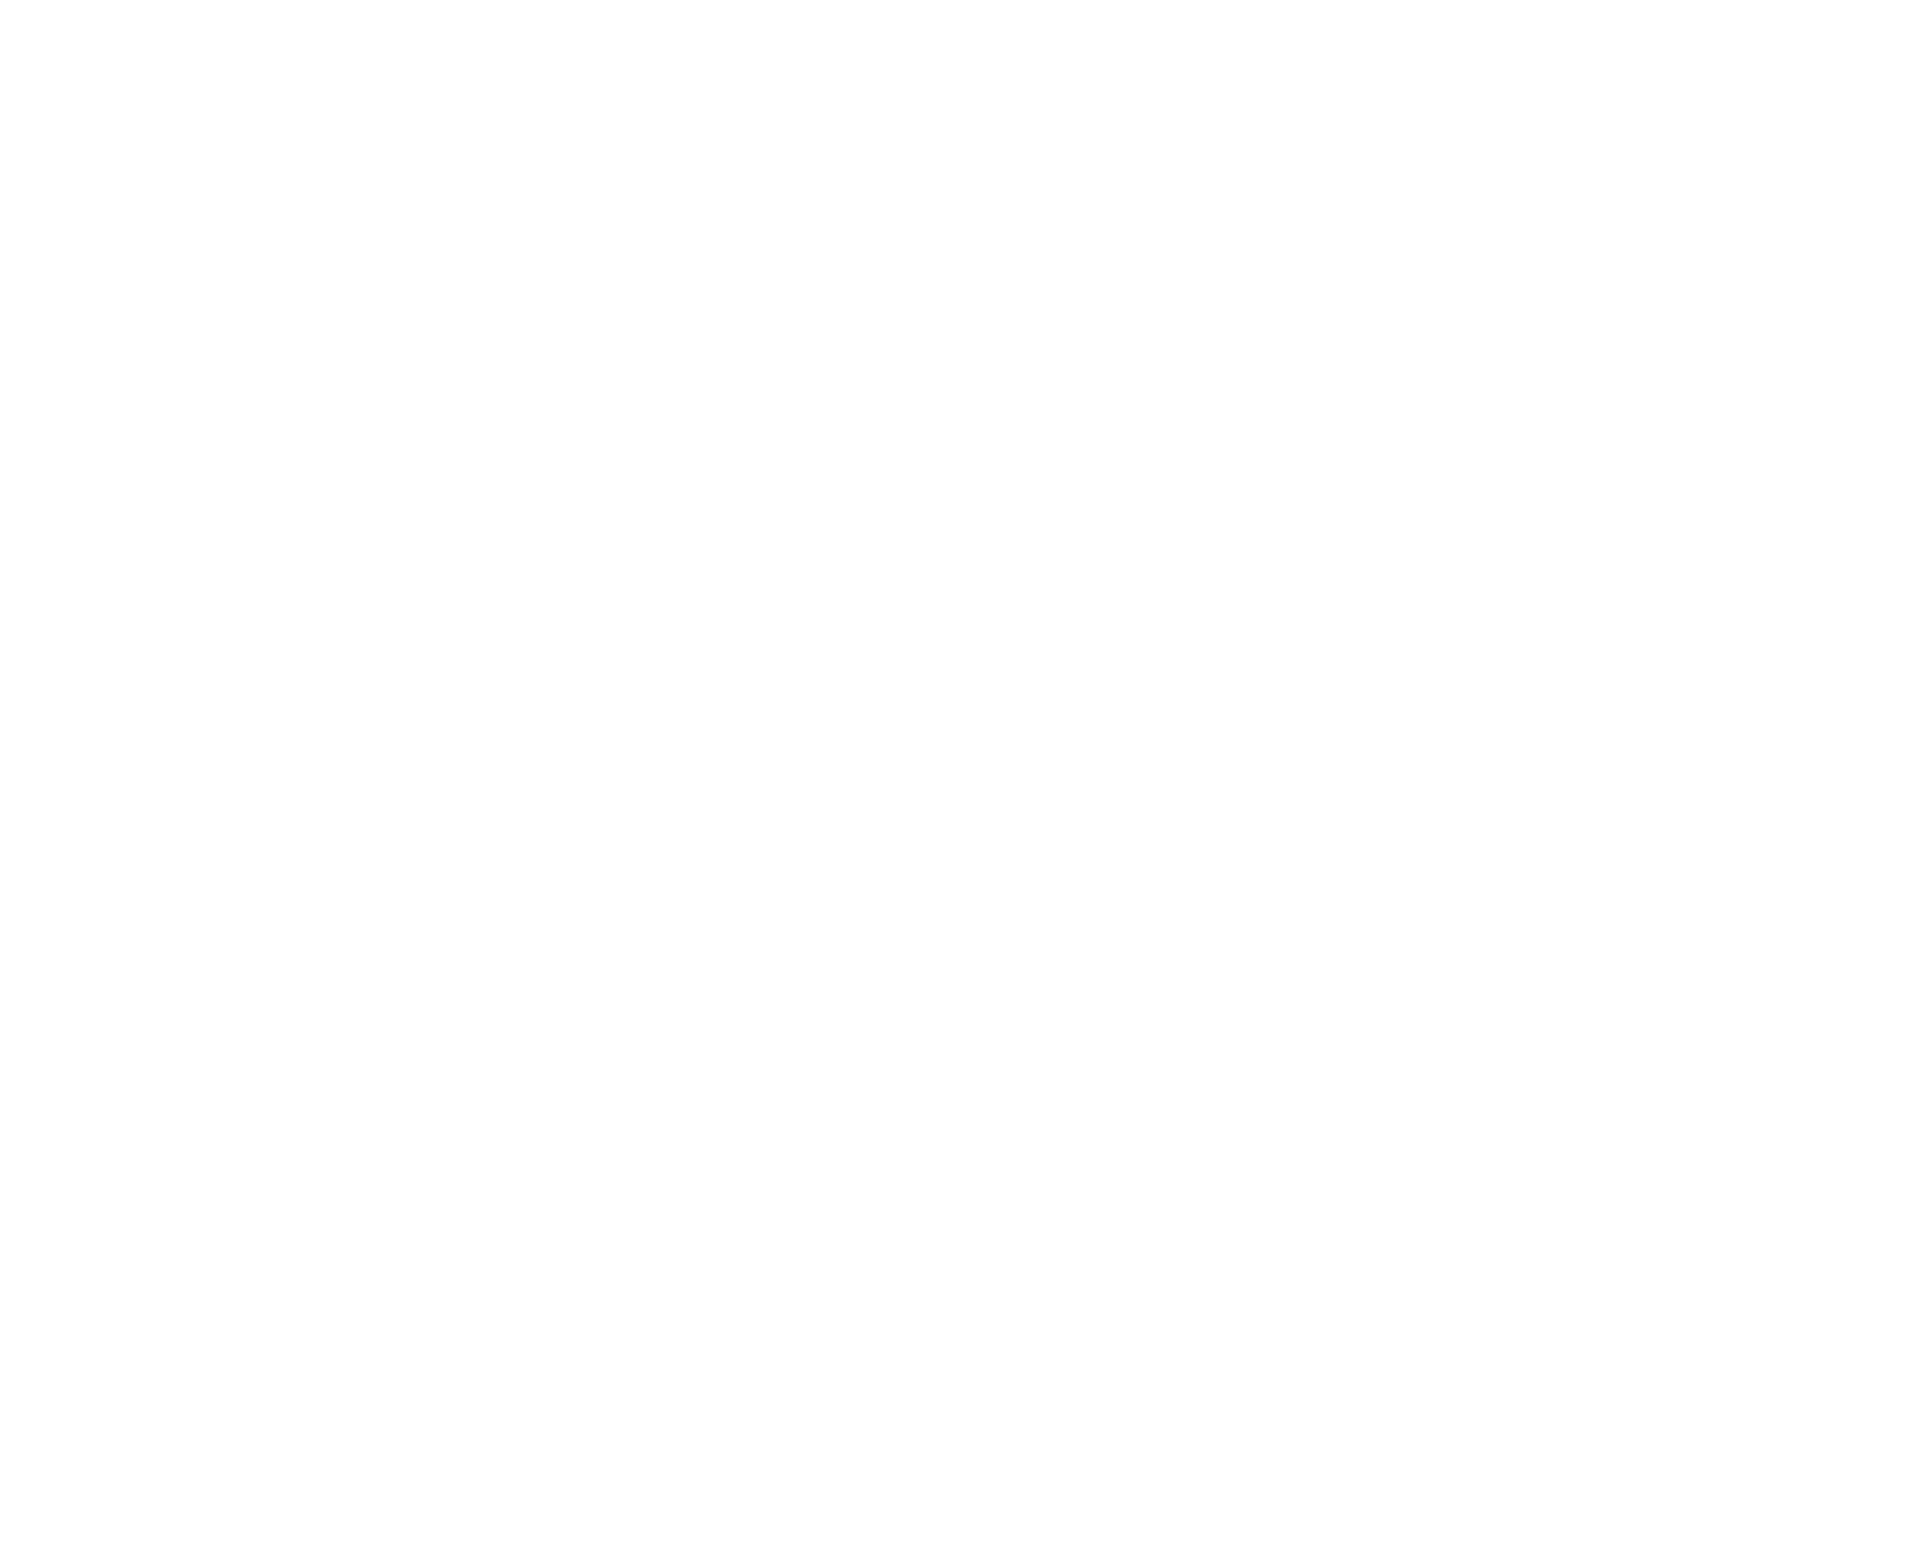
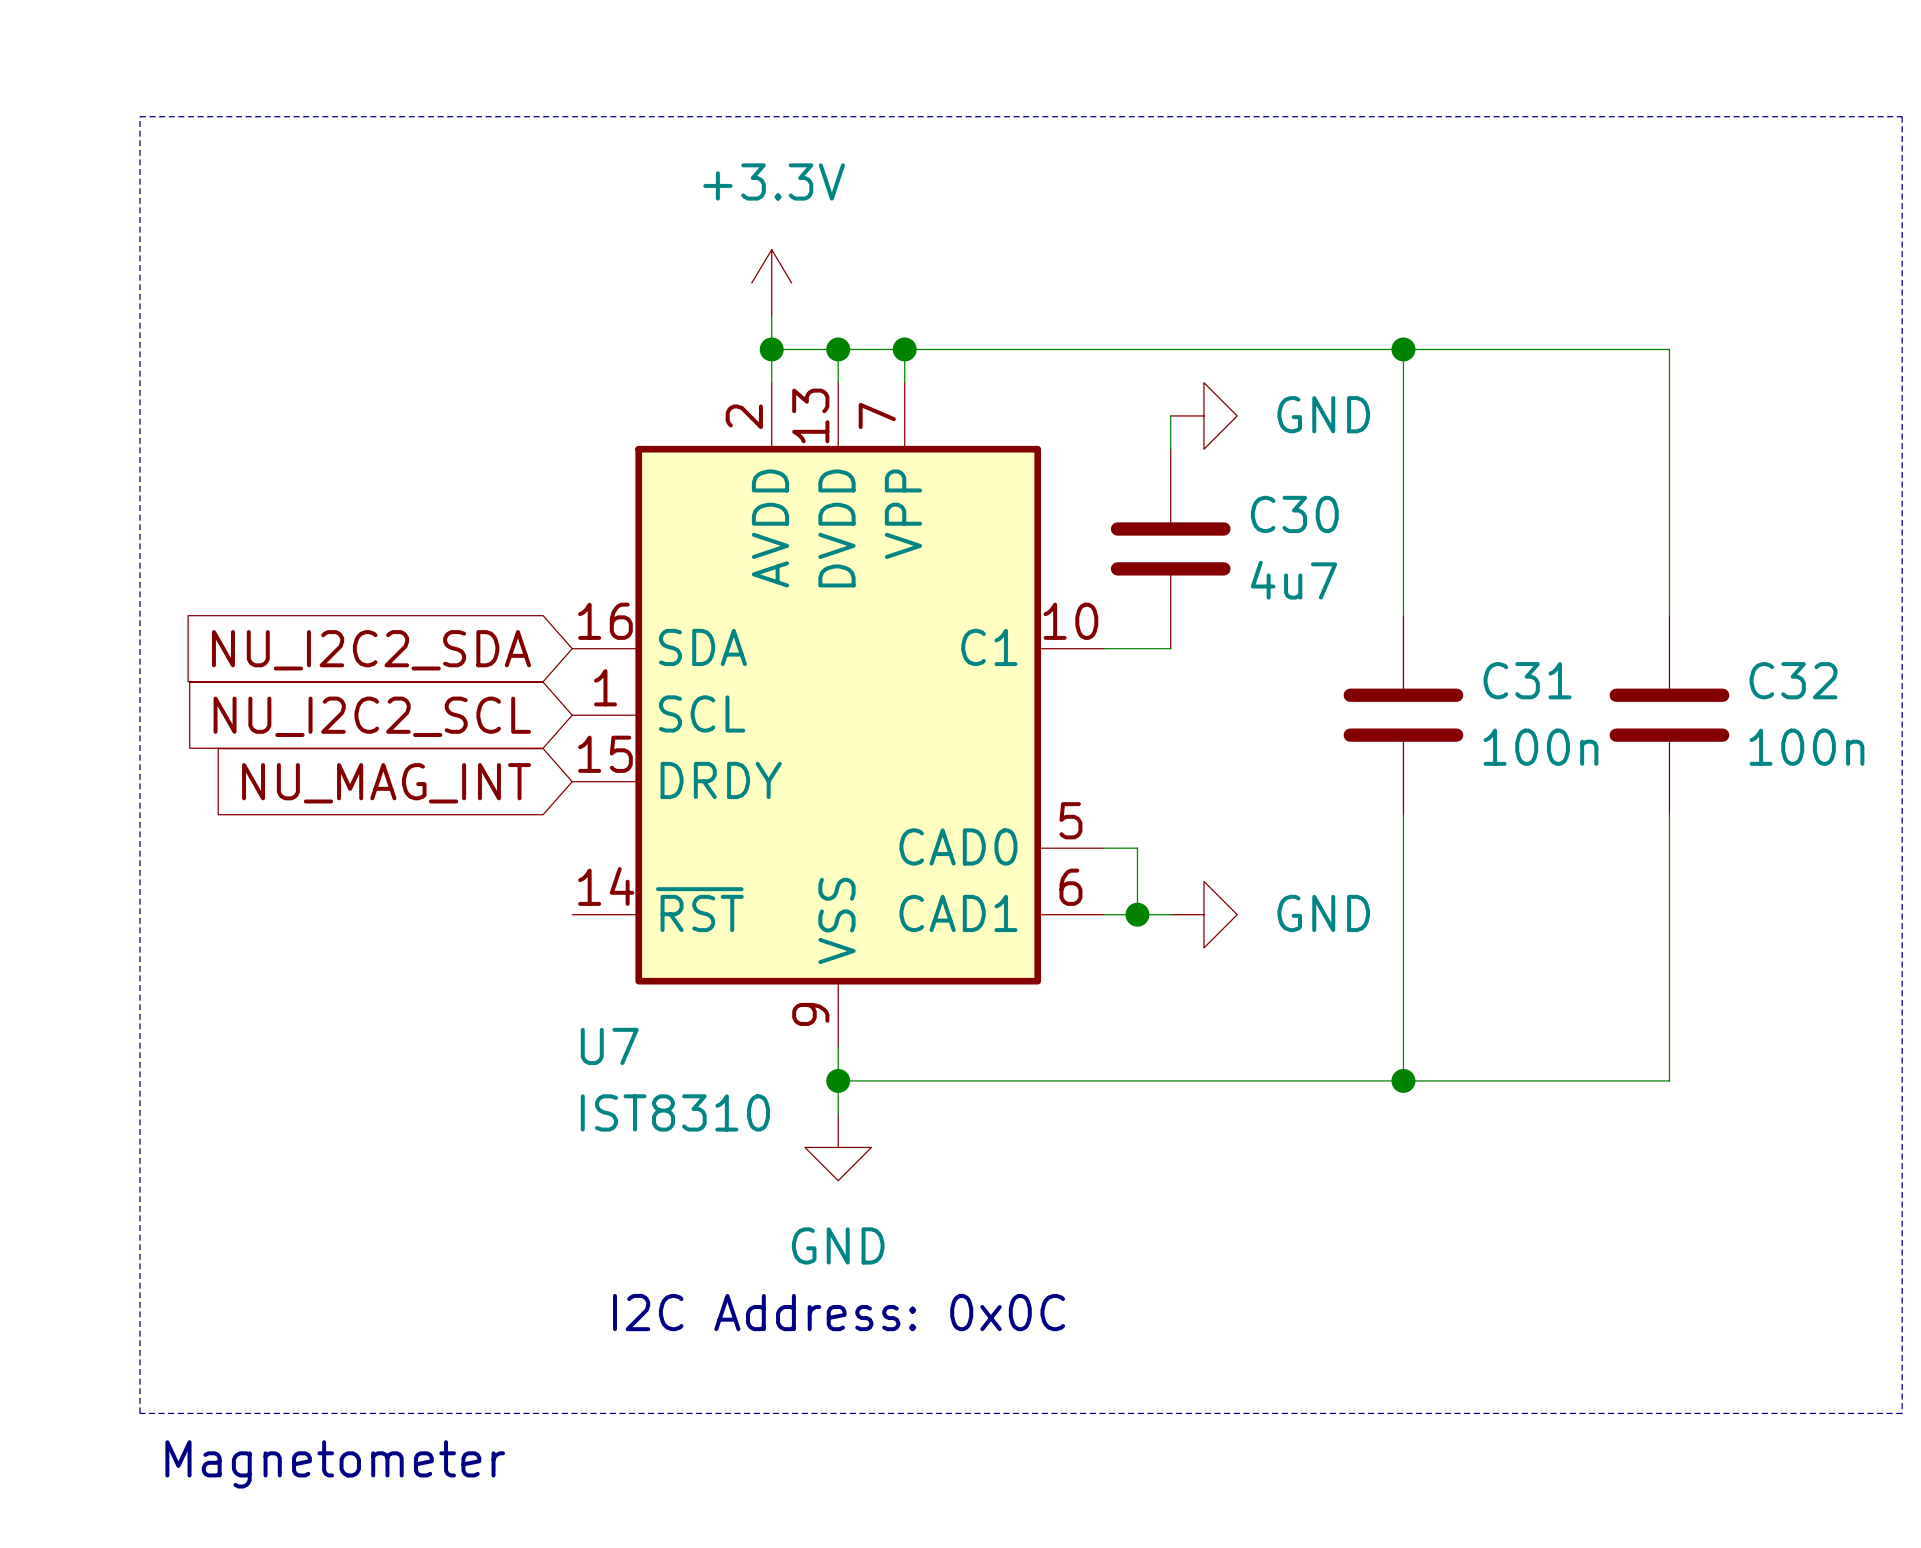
line: none -> (139, 116) (1902, 116) (1902, 1413) (139, 1413) (139, 116)
power symbol: none -> +3.3V (771, 282)
wire: none -> (771, 316) (771, 382)
wire: none -> (771, 349) (1669, 349) (1669, 615)
junction: none -> (771, 349)
wire: none -> (838, 349) (838, 382)
junction: none -> (838, 349)
wire: none -> (904, 349) (904, 382)
junction: none -> (904, 349)
wire: none -> (1403, 349) (1403, 615)
junction: none -> (1403, 349)
wire: none -> (1170, 415) (1170, 449)
power symbol: none -> GND (1203, 415)
C30: none -> 4u7 (1170, 548)
wire: none -> (1104, 648) (1170, 648)
global label: none -> NU_I2C2_SDA (371, 650)
U7: none -> IST8310 (838, 715)
C31: none -> 100n (1403, 715)
C32: none -> 100n (1669, 715)
global label: none -> NU_I2C2_SCL (372, 716)
global label: none -> NU_MAG_INT (386, 783)
wire: none -> (1403, 814) (1403, 1080)
wire: none -> (1669, 814) (1669, 1080) (838, 1080)
wire: none -> (1104, 848) (1137, 848) (1137, 914)
wire: none -> (1104, 914) (1170, 914)
junction: none -> (1137, 914)
power symbol: none -> GND (1203, 914)
wire: none -> (838, 1047) (838, 1114)
junction: none -> (838, 1080)
junction: none -> (1403, 1080)
power symbol: none -> GND (838, 1147)
text: none -> I2C Address: 0x0C (839, 1312)
text: none -> Magnetometer (335, 1464)

